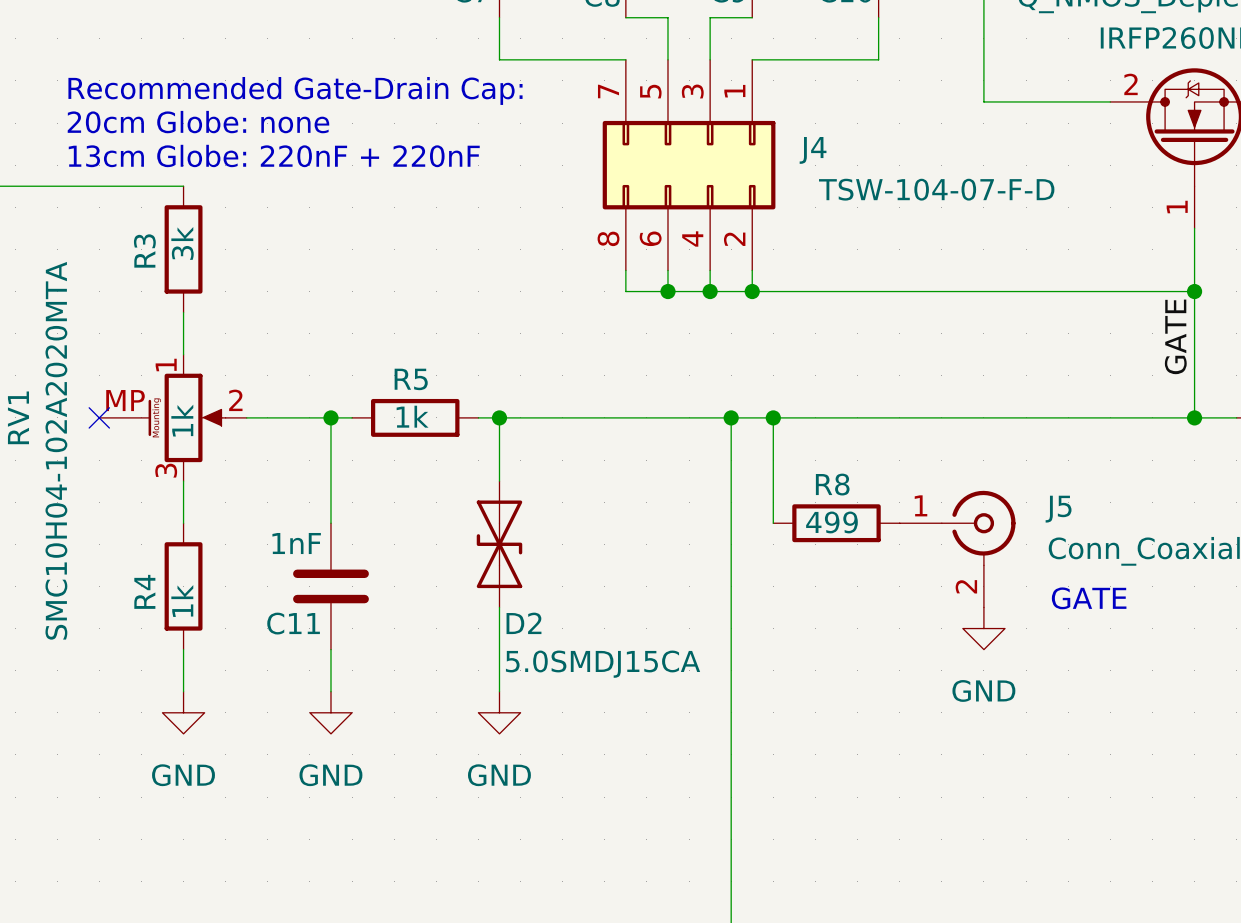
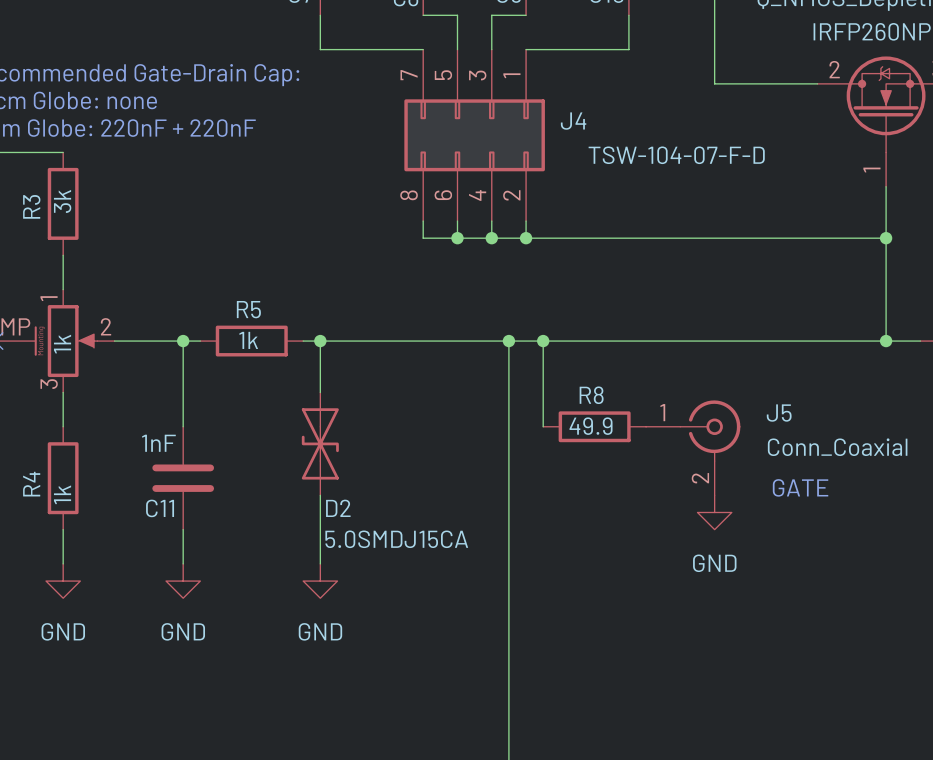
label: GATE (1175, 336) -> none
R8 value: 499 (831, 522) -> 49.9 (591, 426)

